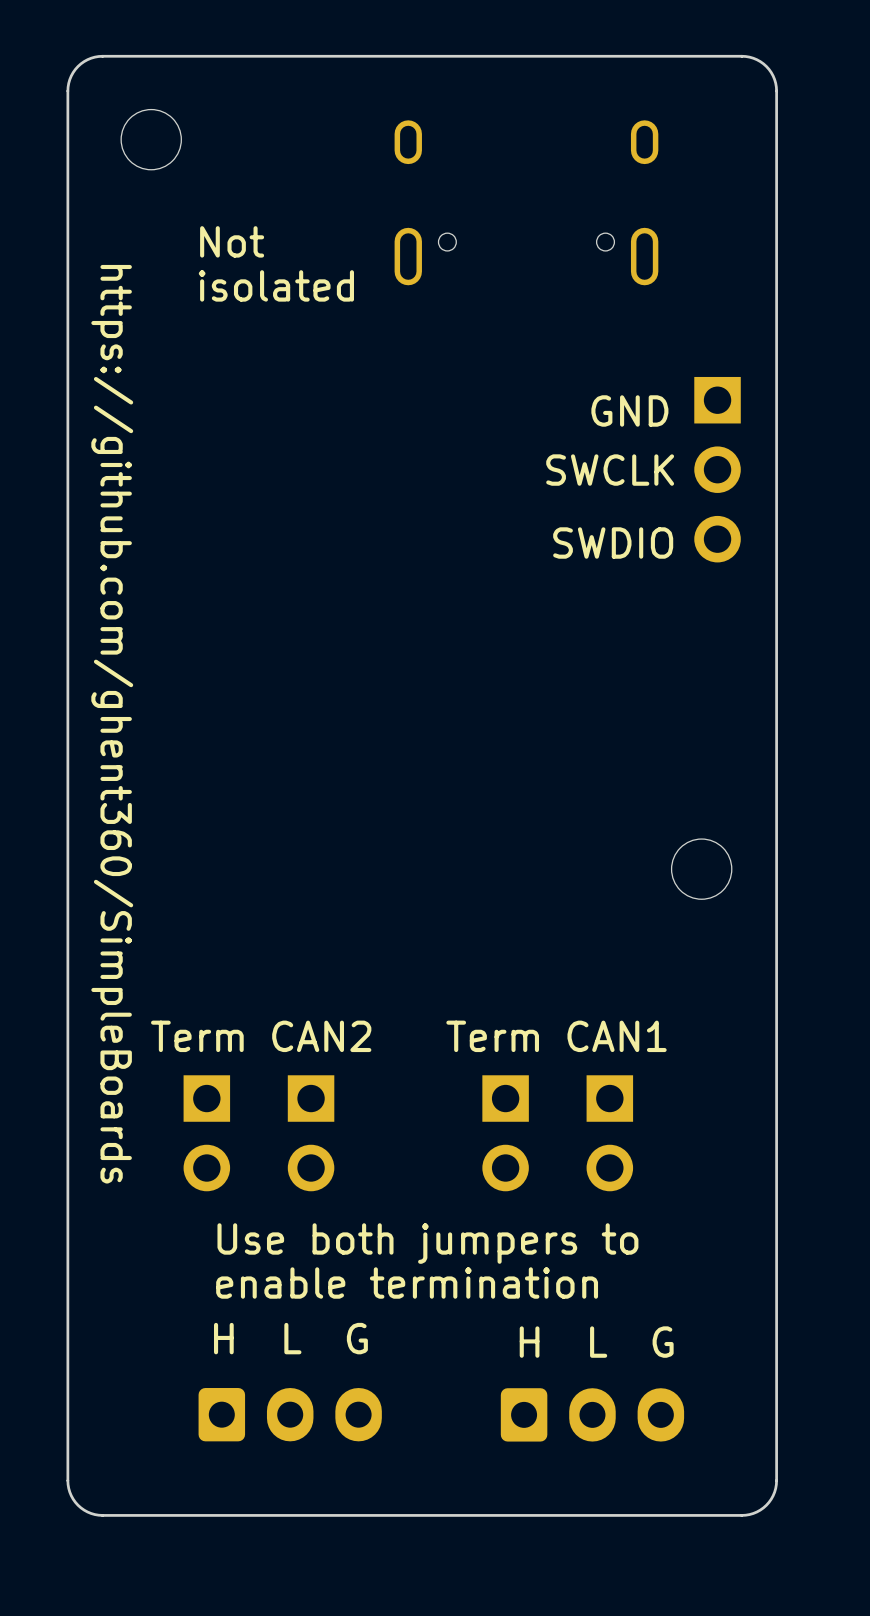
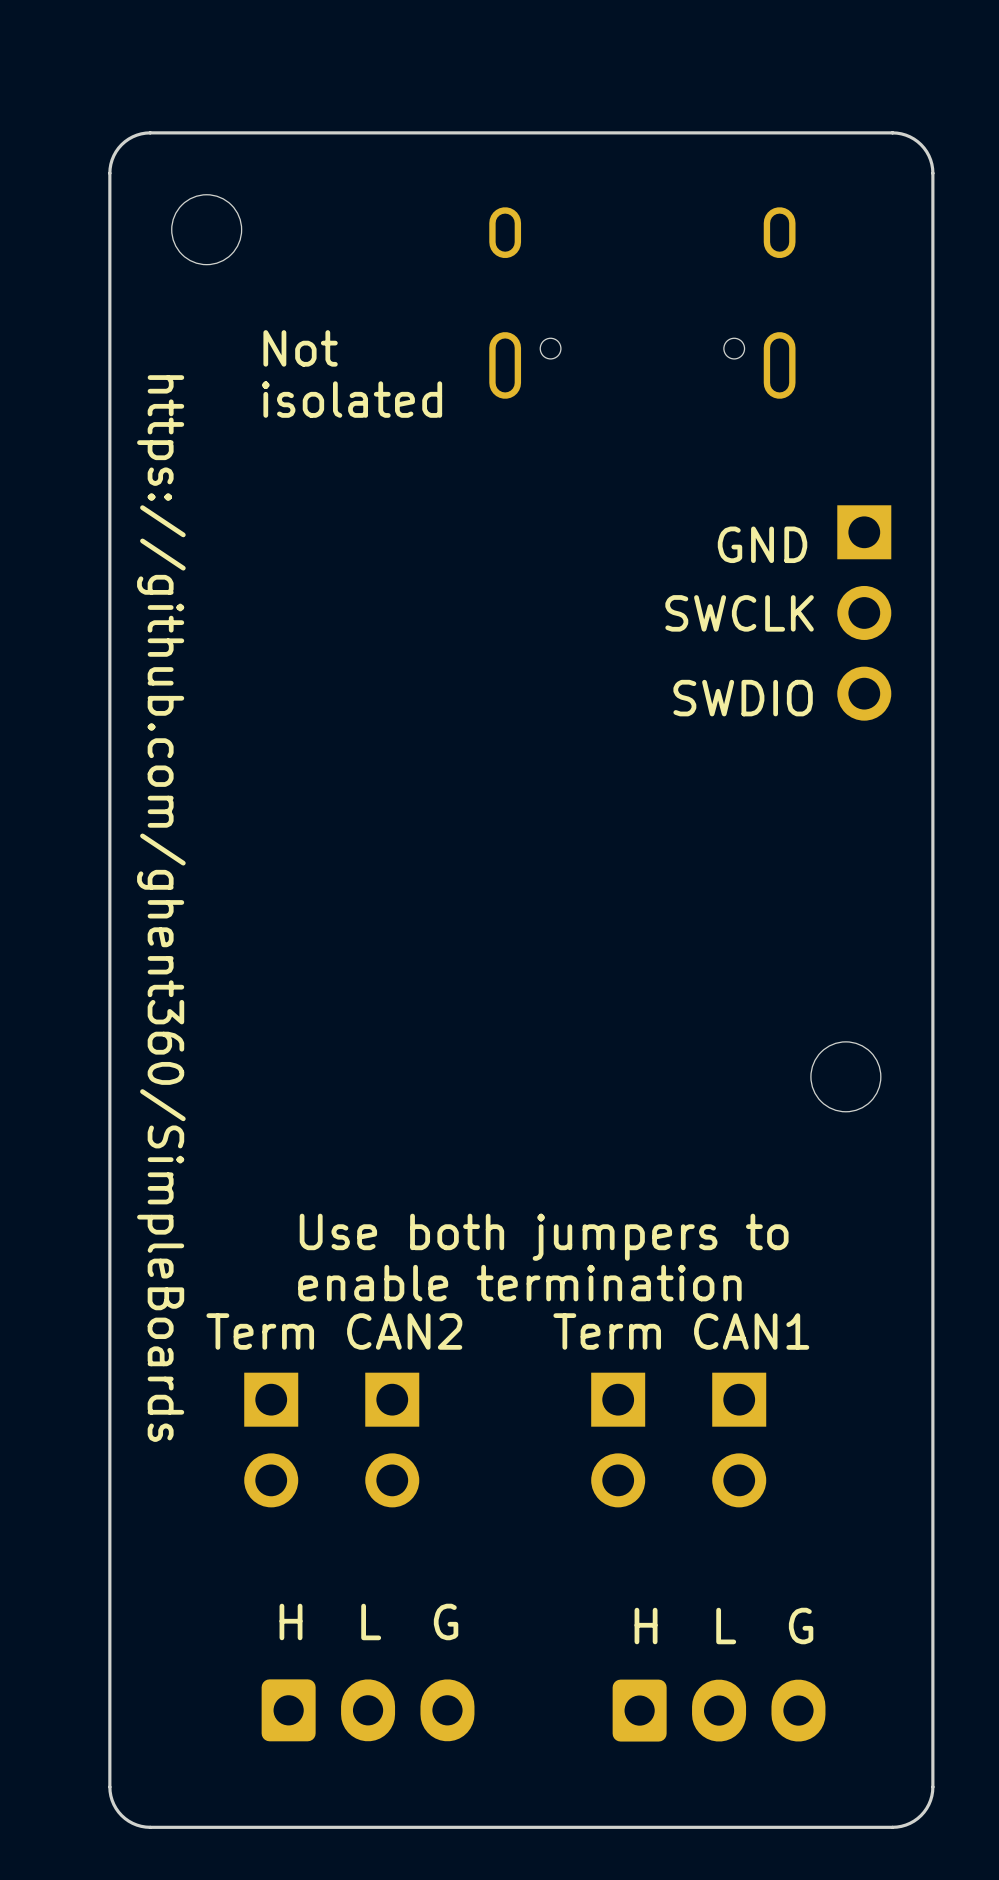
text position: Term CAN2 (261, 1036) -> Term CAN2 (334, 1331)
text position: Term CAN1 (556, 1036) -> Term CAN1 (681, 1331)
part position: (206, 1133) -> (271, 1440)
part position: (311, 1133) -> (392, 1440)
part position: (505, 1133) -> (618, 1440)
part position: (609, 1133) -> (739, 1440)
text position: Use both jumpers to (427, 1243) -> Use both jumpers to (544, 1237)
text position: enable termination (407, 1283) -> enable termination (519, 1283)

